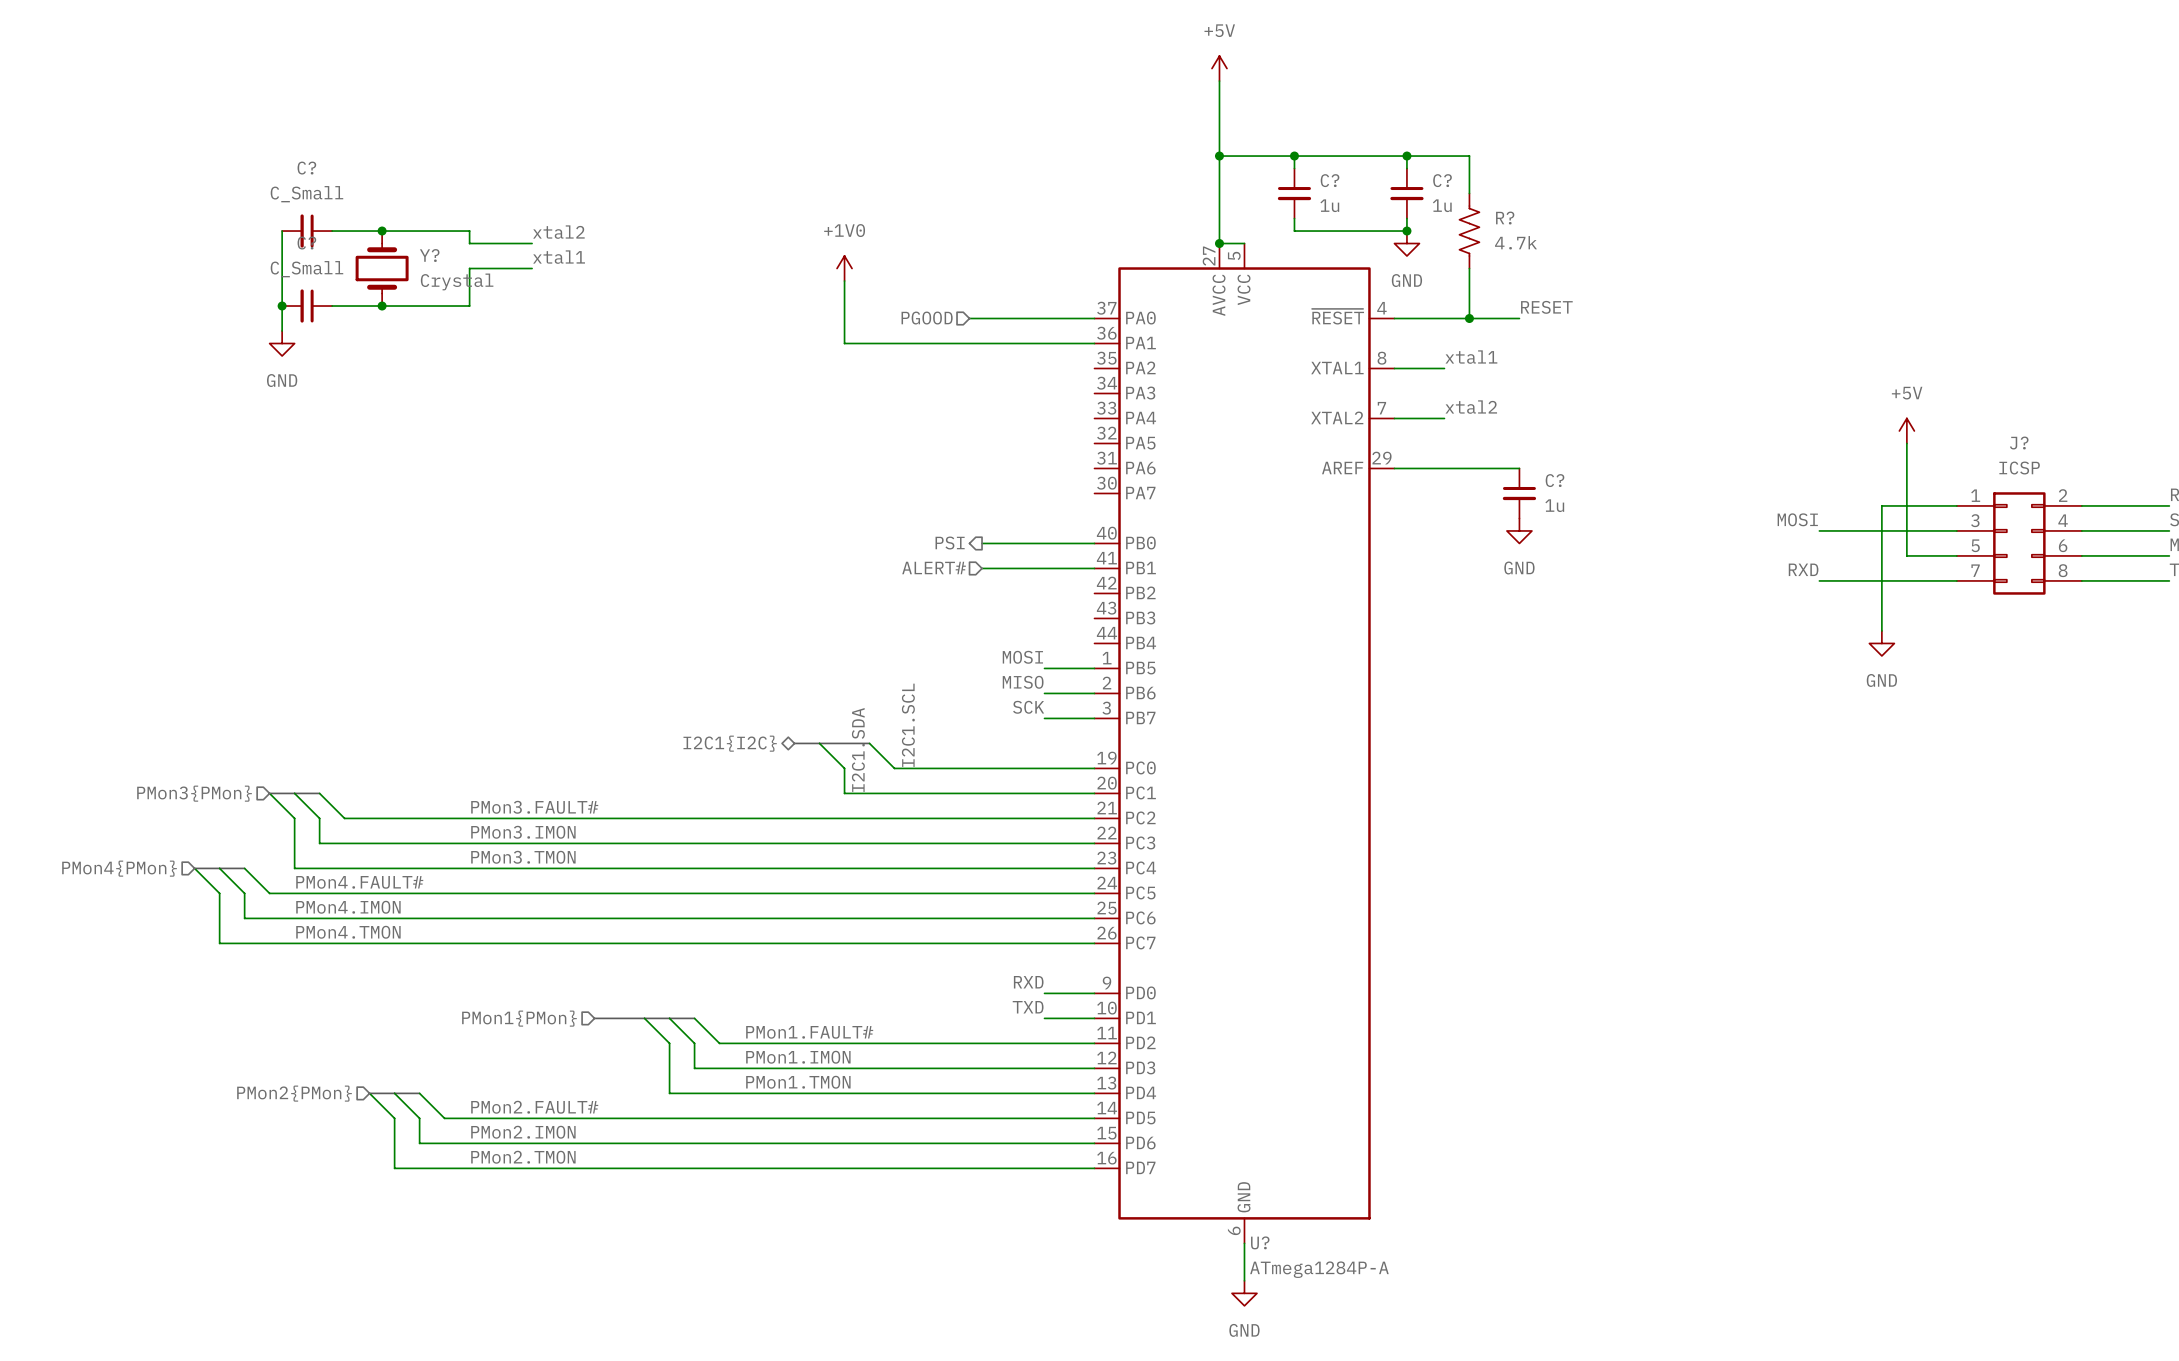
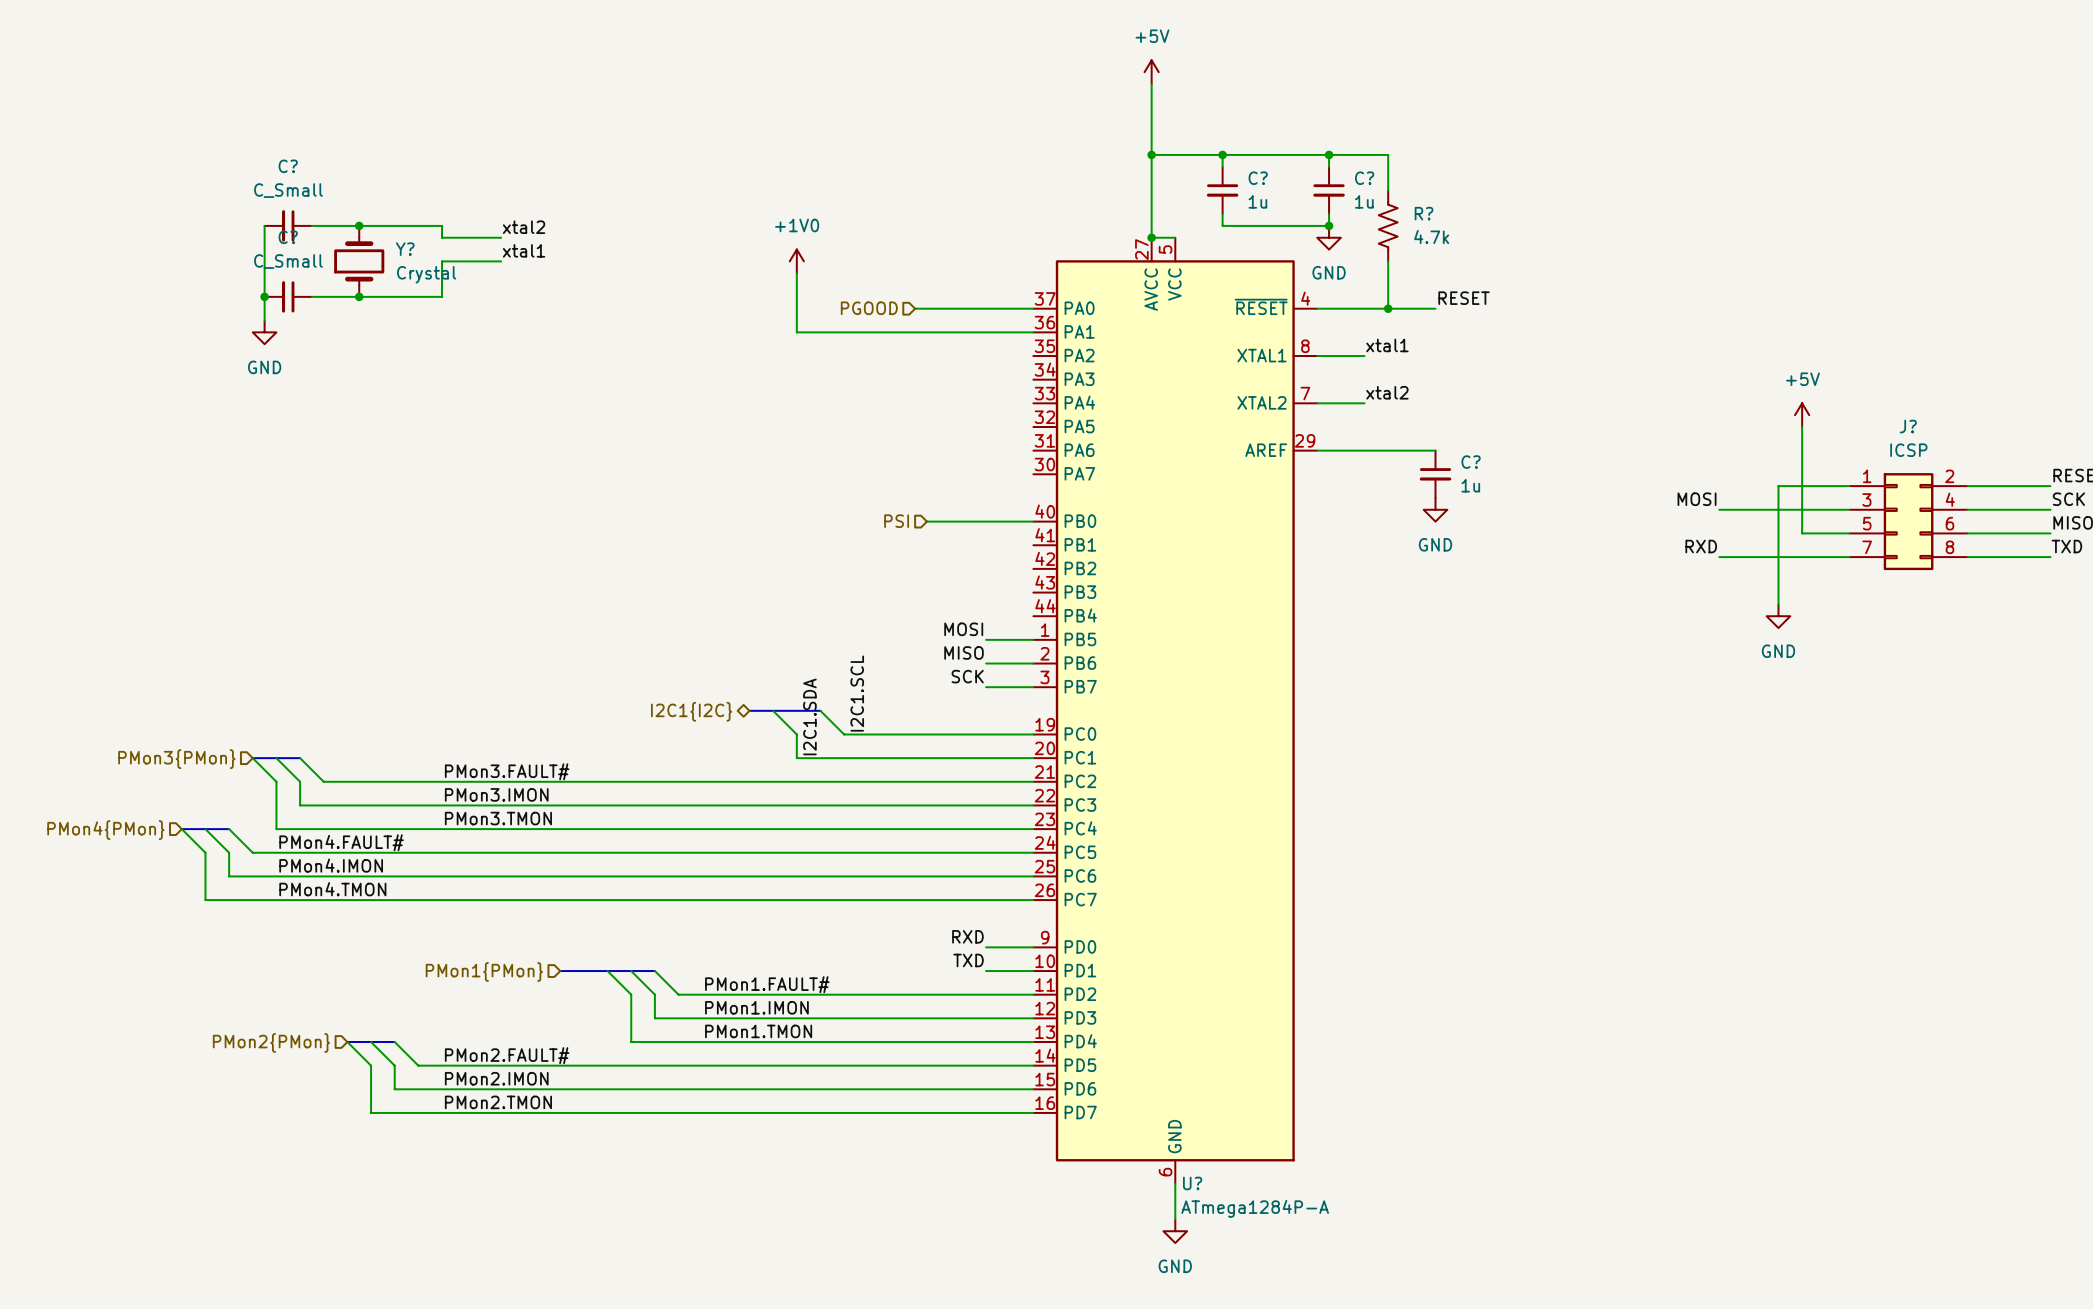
hierarchical label shape: output (950, 543) -> input (896, 521)
hierarchical label: ALERT# (934, 568) -> none
wire: (982, 568) (1094, 568) -> none

